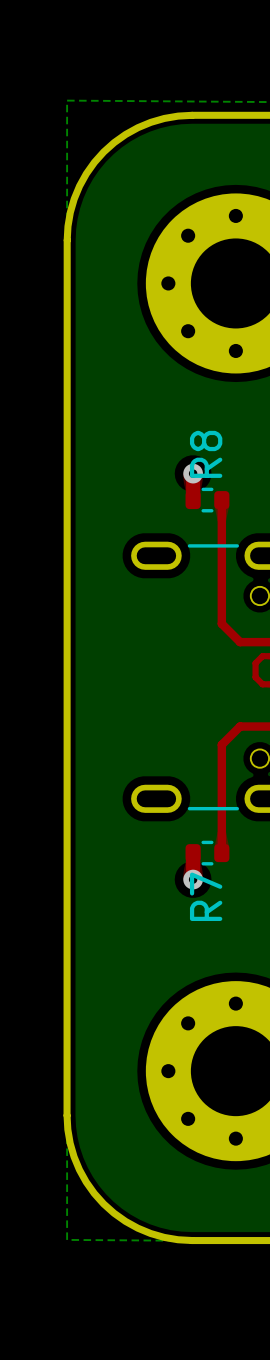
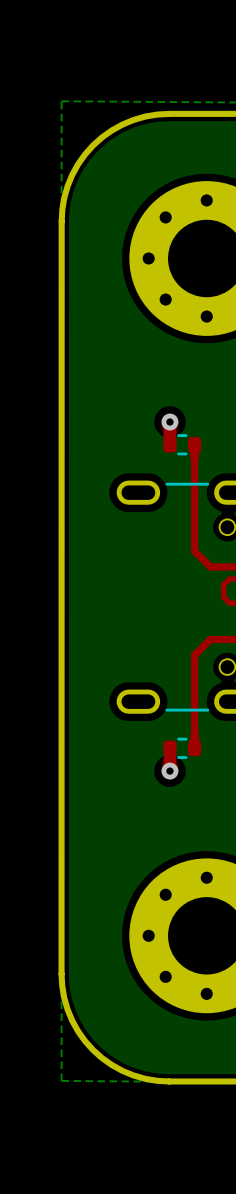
R8 name: R8 (206, 454) -> none
R7 name: R7 (206, 896) -> none

